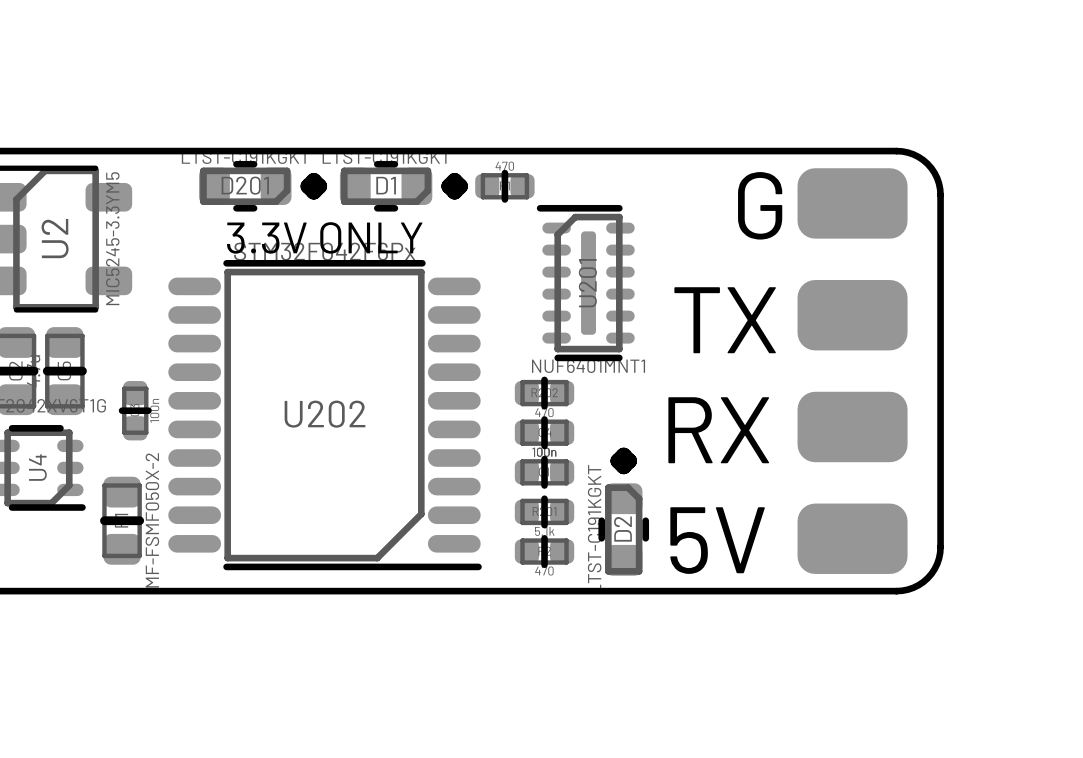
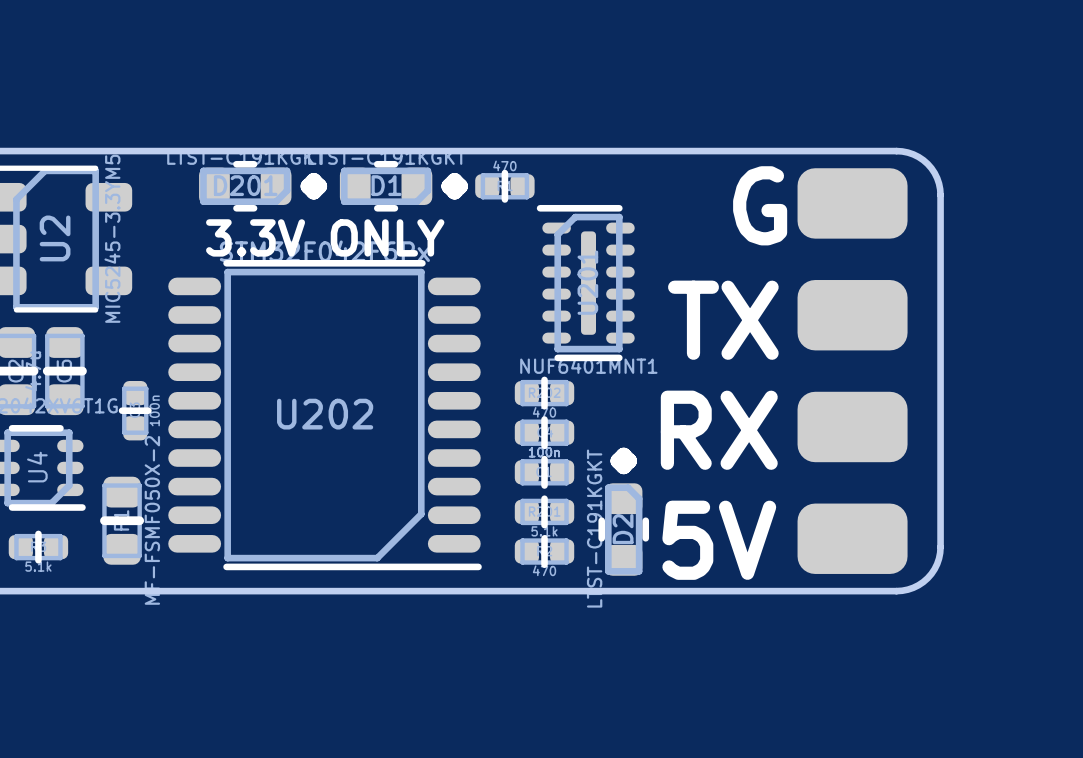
part: none -> 5.1k (38, 547)

